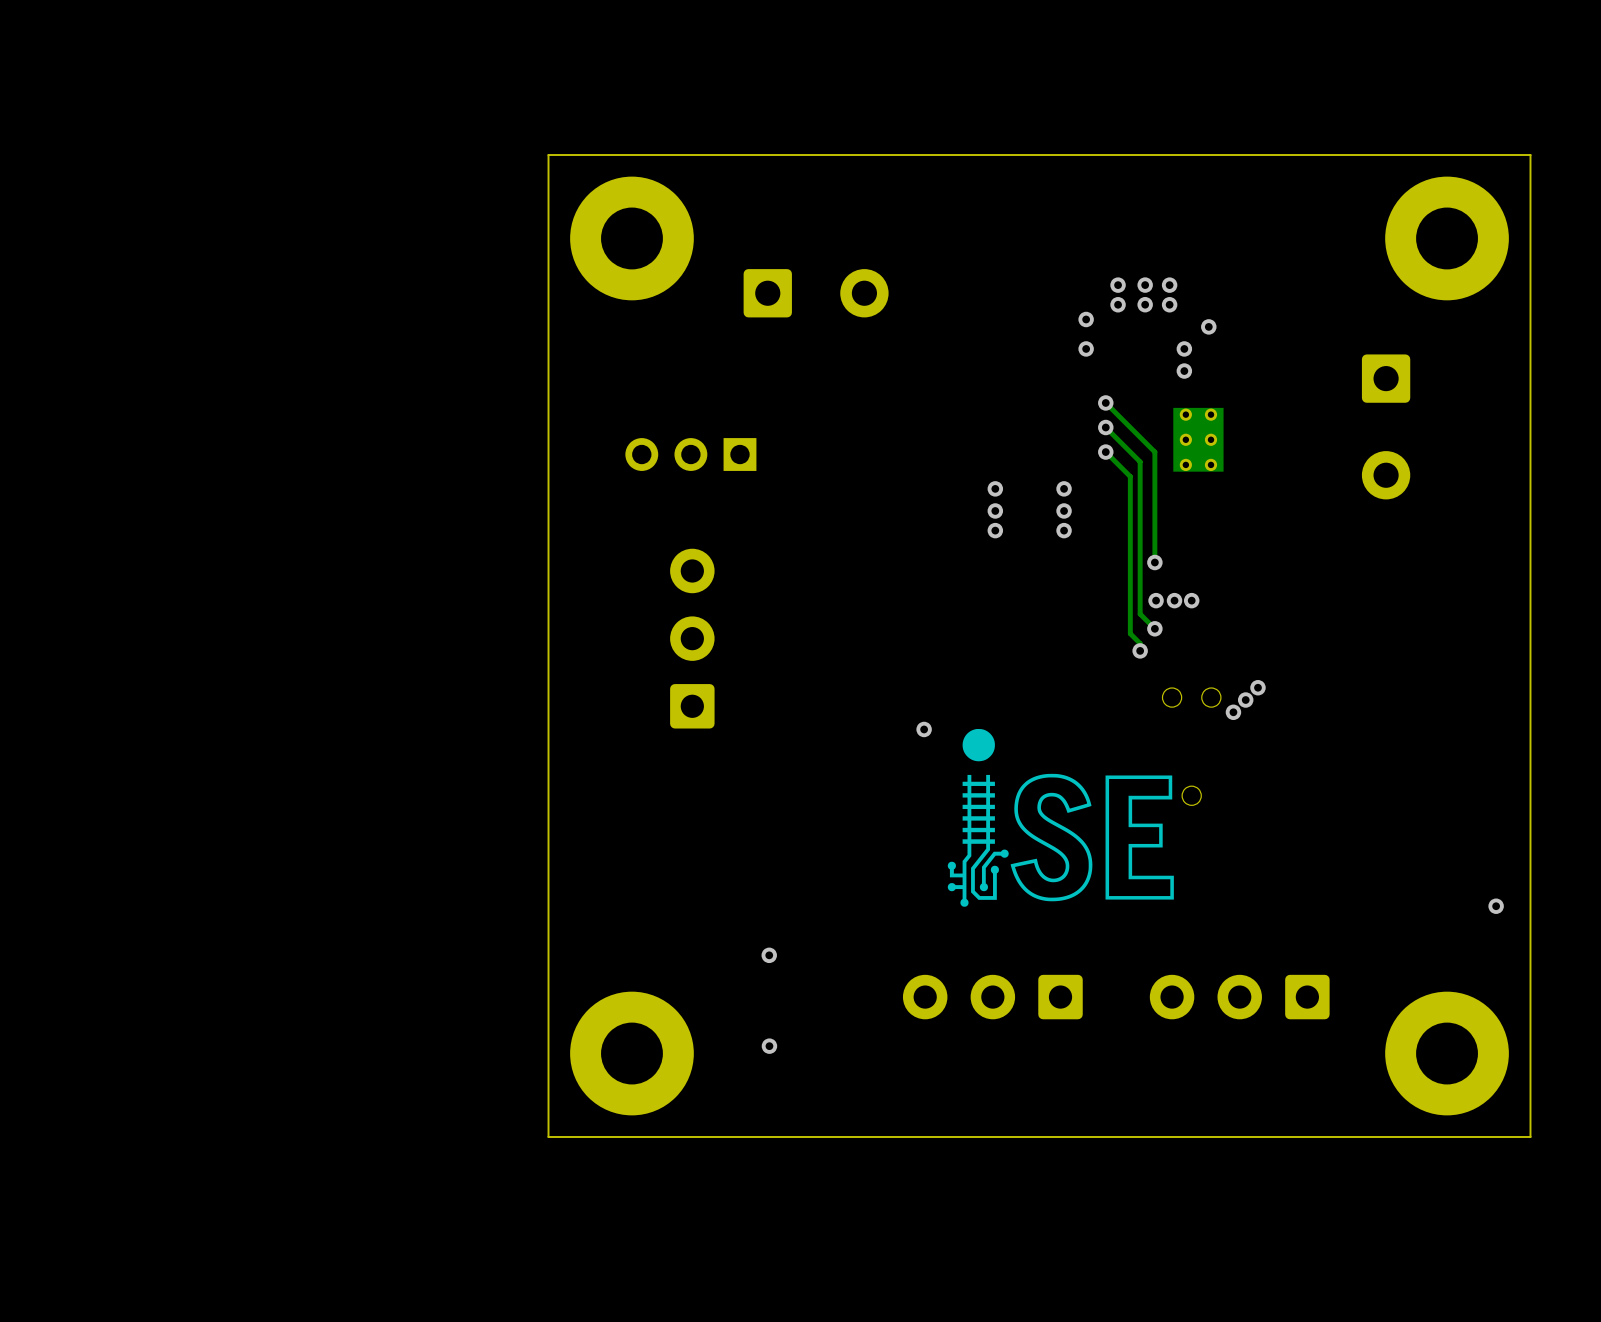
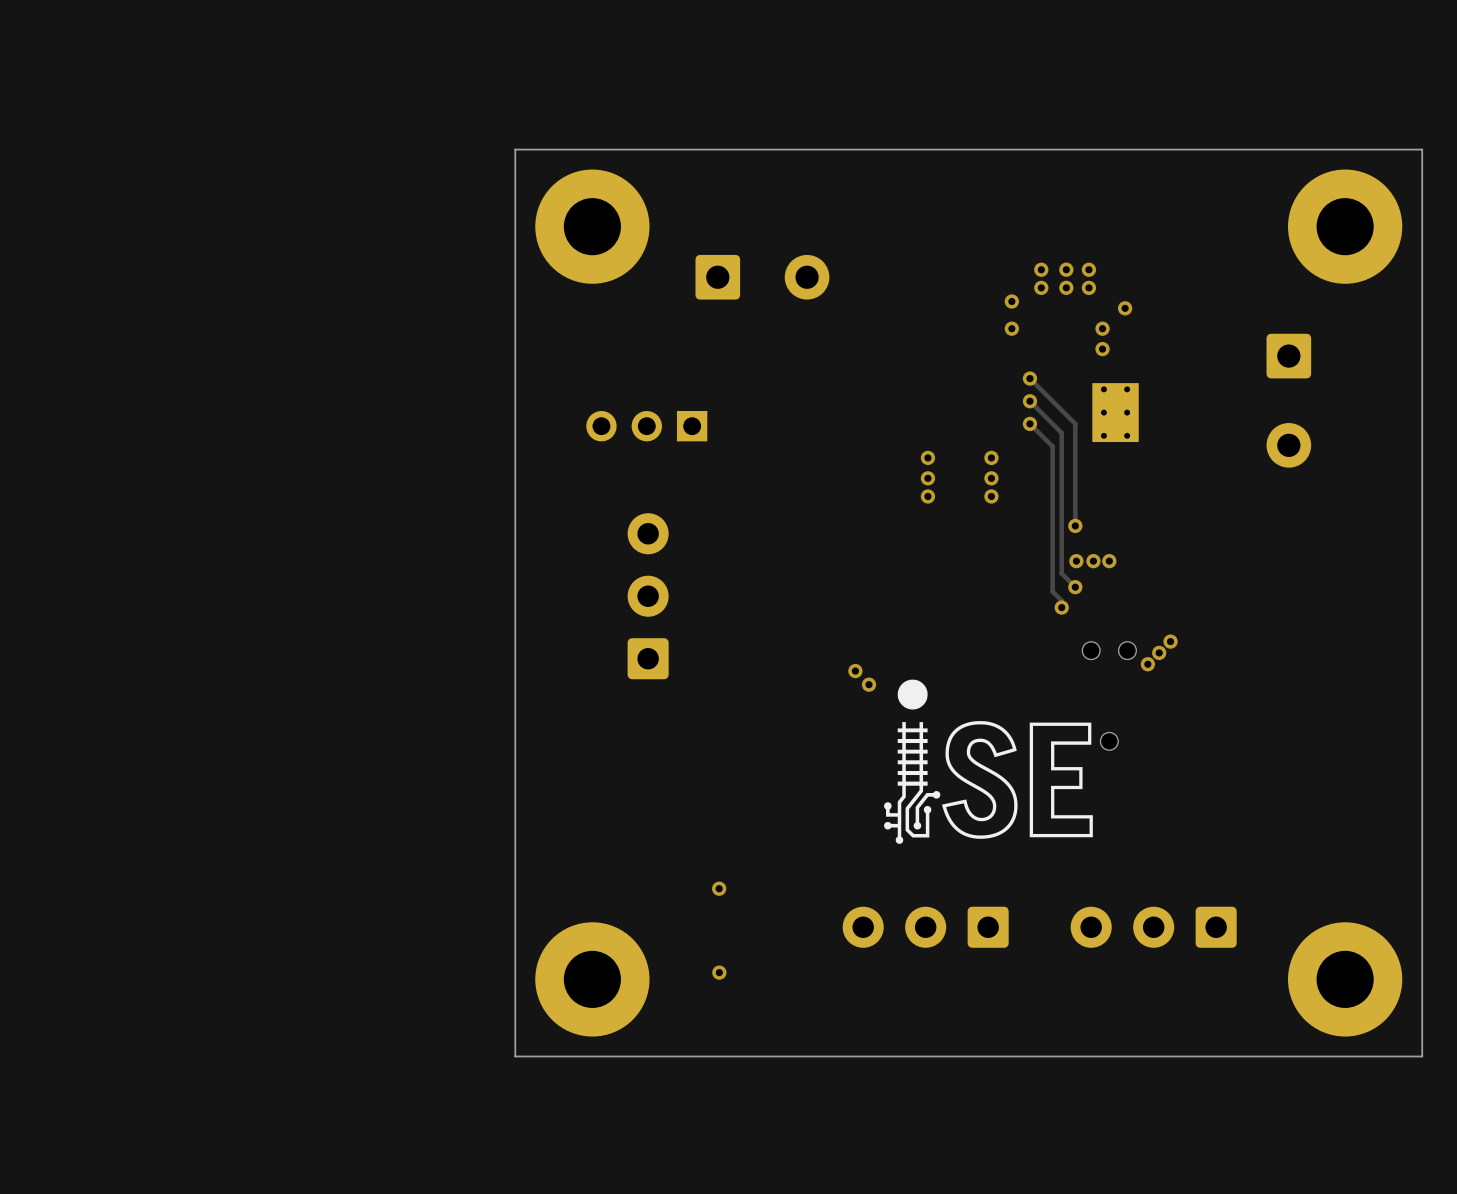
via: none -> (855, 671)
via: (924, 729) -> none
via: none -> (869, 684)
via: (1496, 906) -> none

